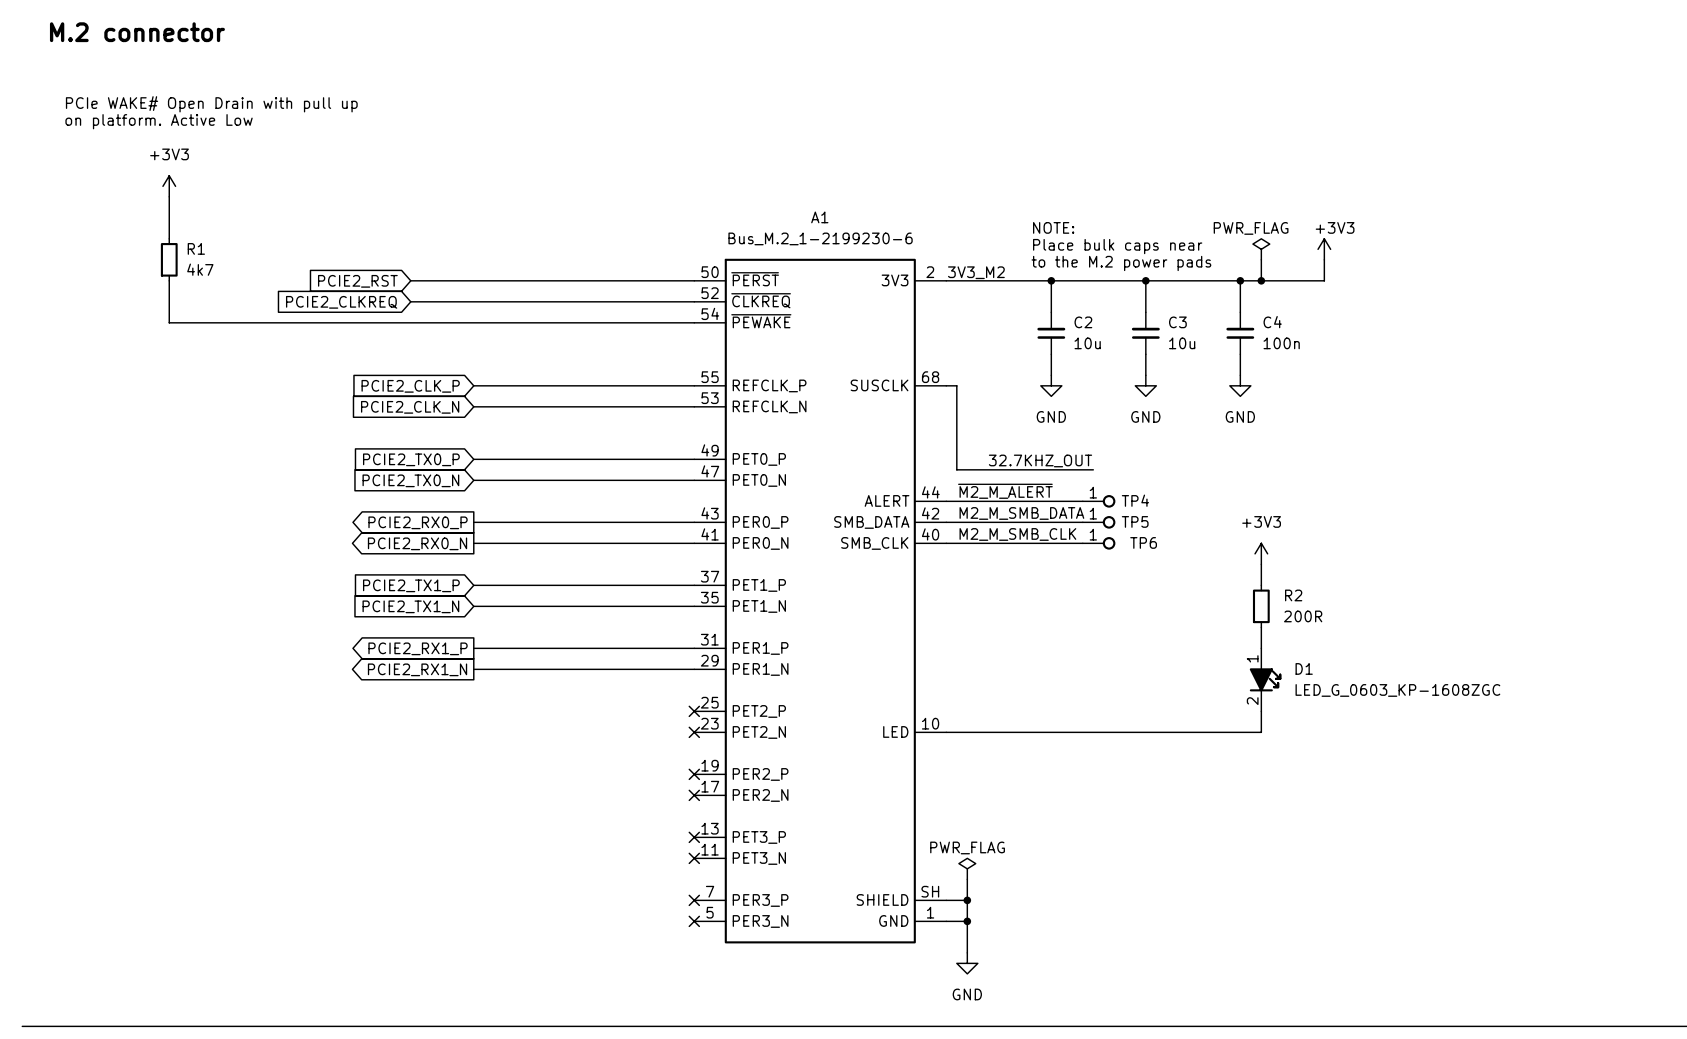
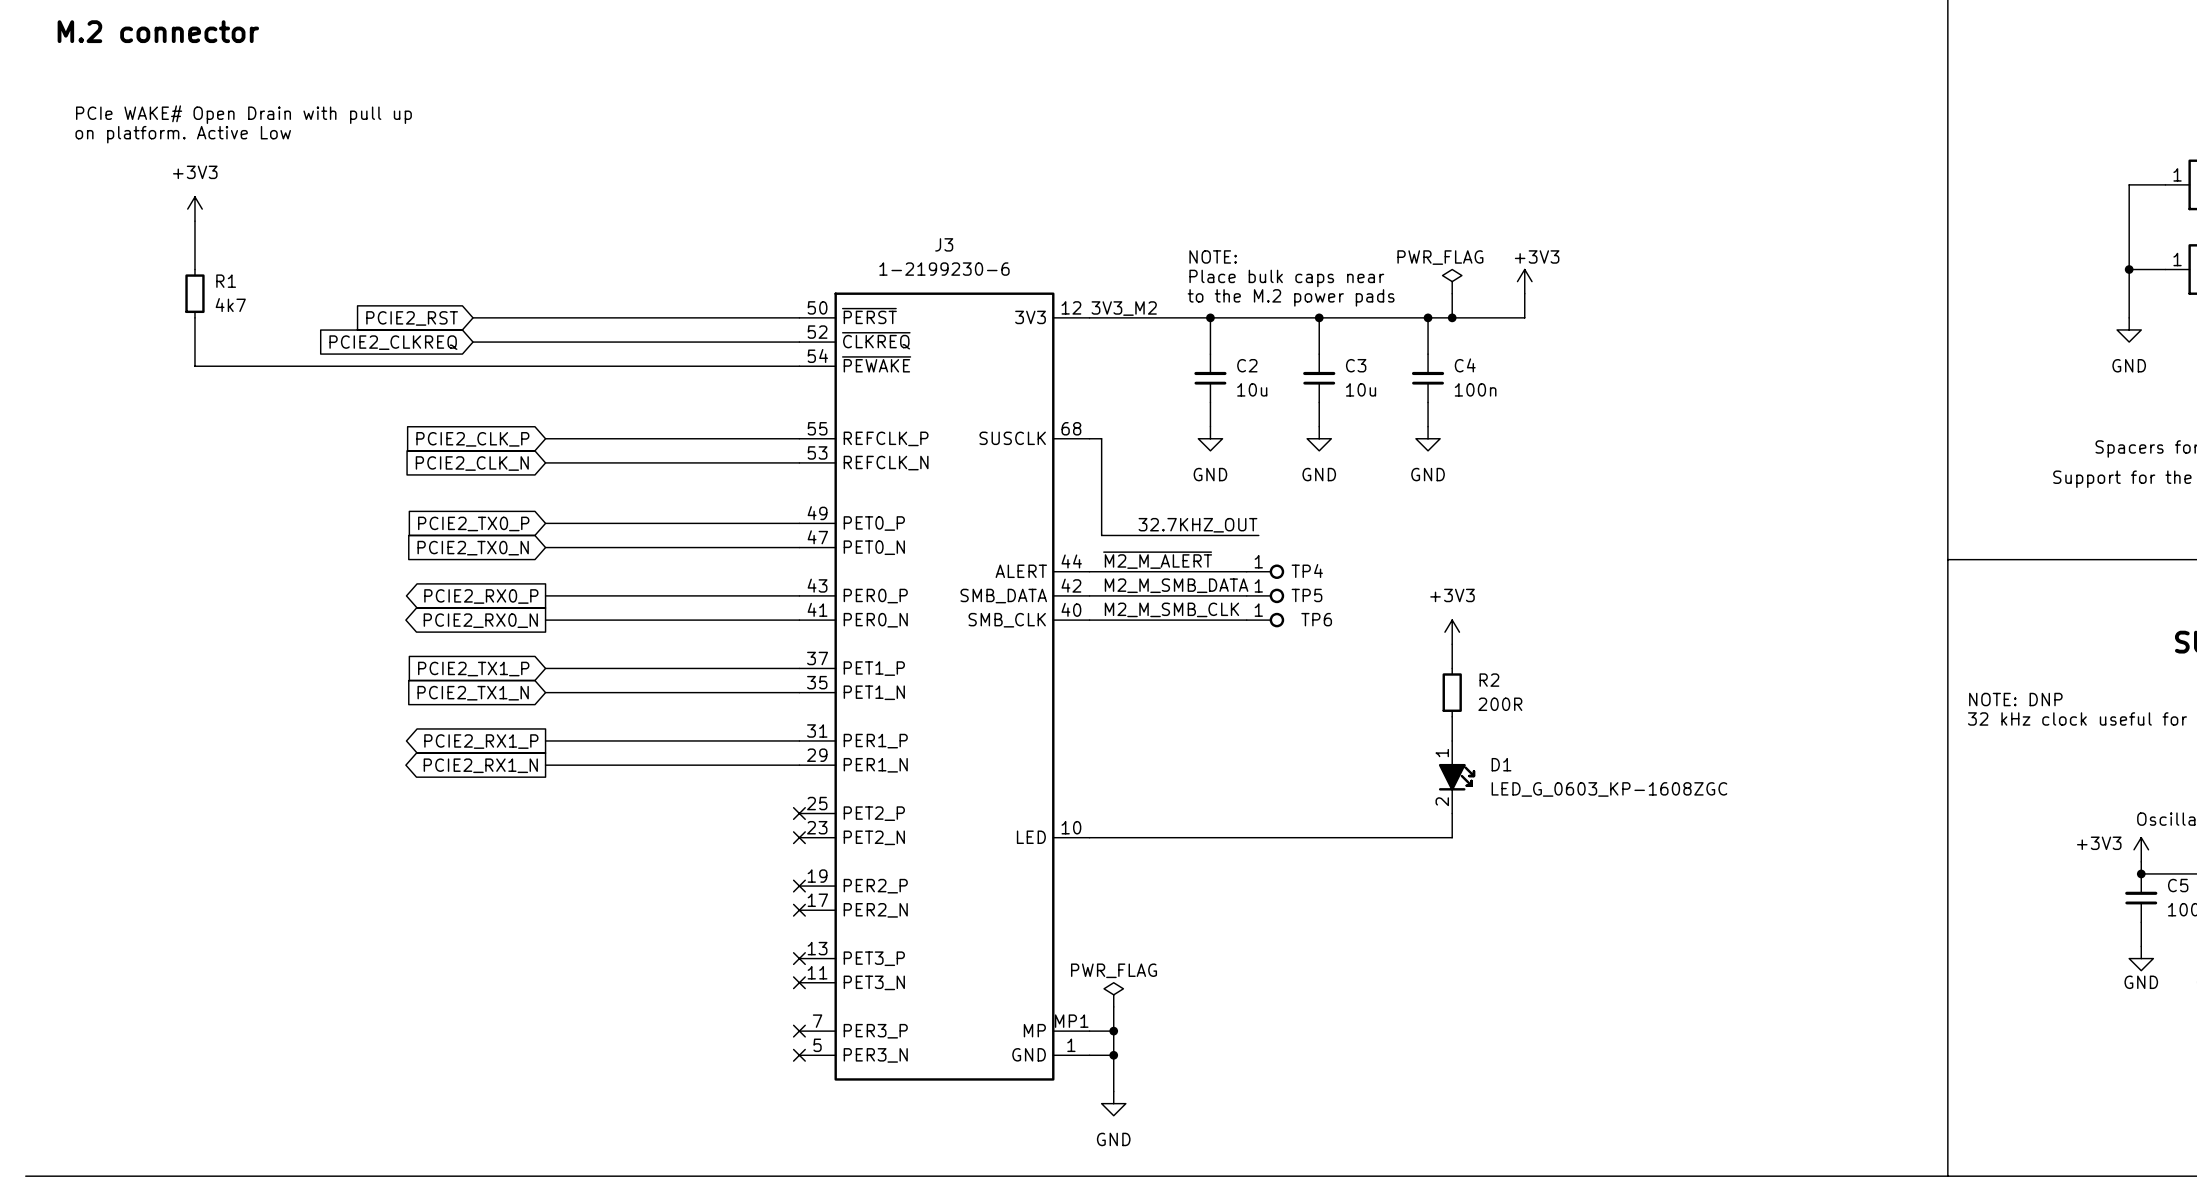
A1 name: A1 (819, 217) -> J3 (944, 244)
A1 text: none -> 1-2199230-6 (944, 269)
A1 value: Bus_M.2_1-2199230-6 (820, 238) -> none
A1 pin number: 2 (930, 272) -> 12 (1071, 307)
A1 pin number: SH (930, 891) -> MP1 (1071, 1021)
A1 pin name: SHIELD (882, 899) -> MP (1034, 1030)

